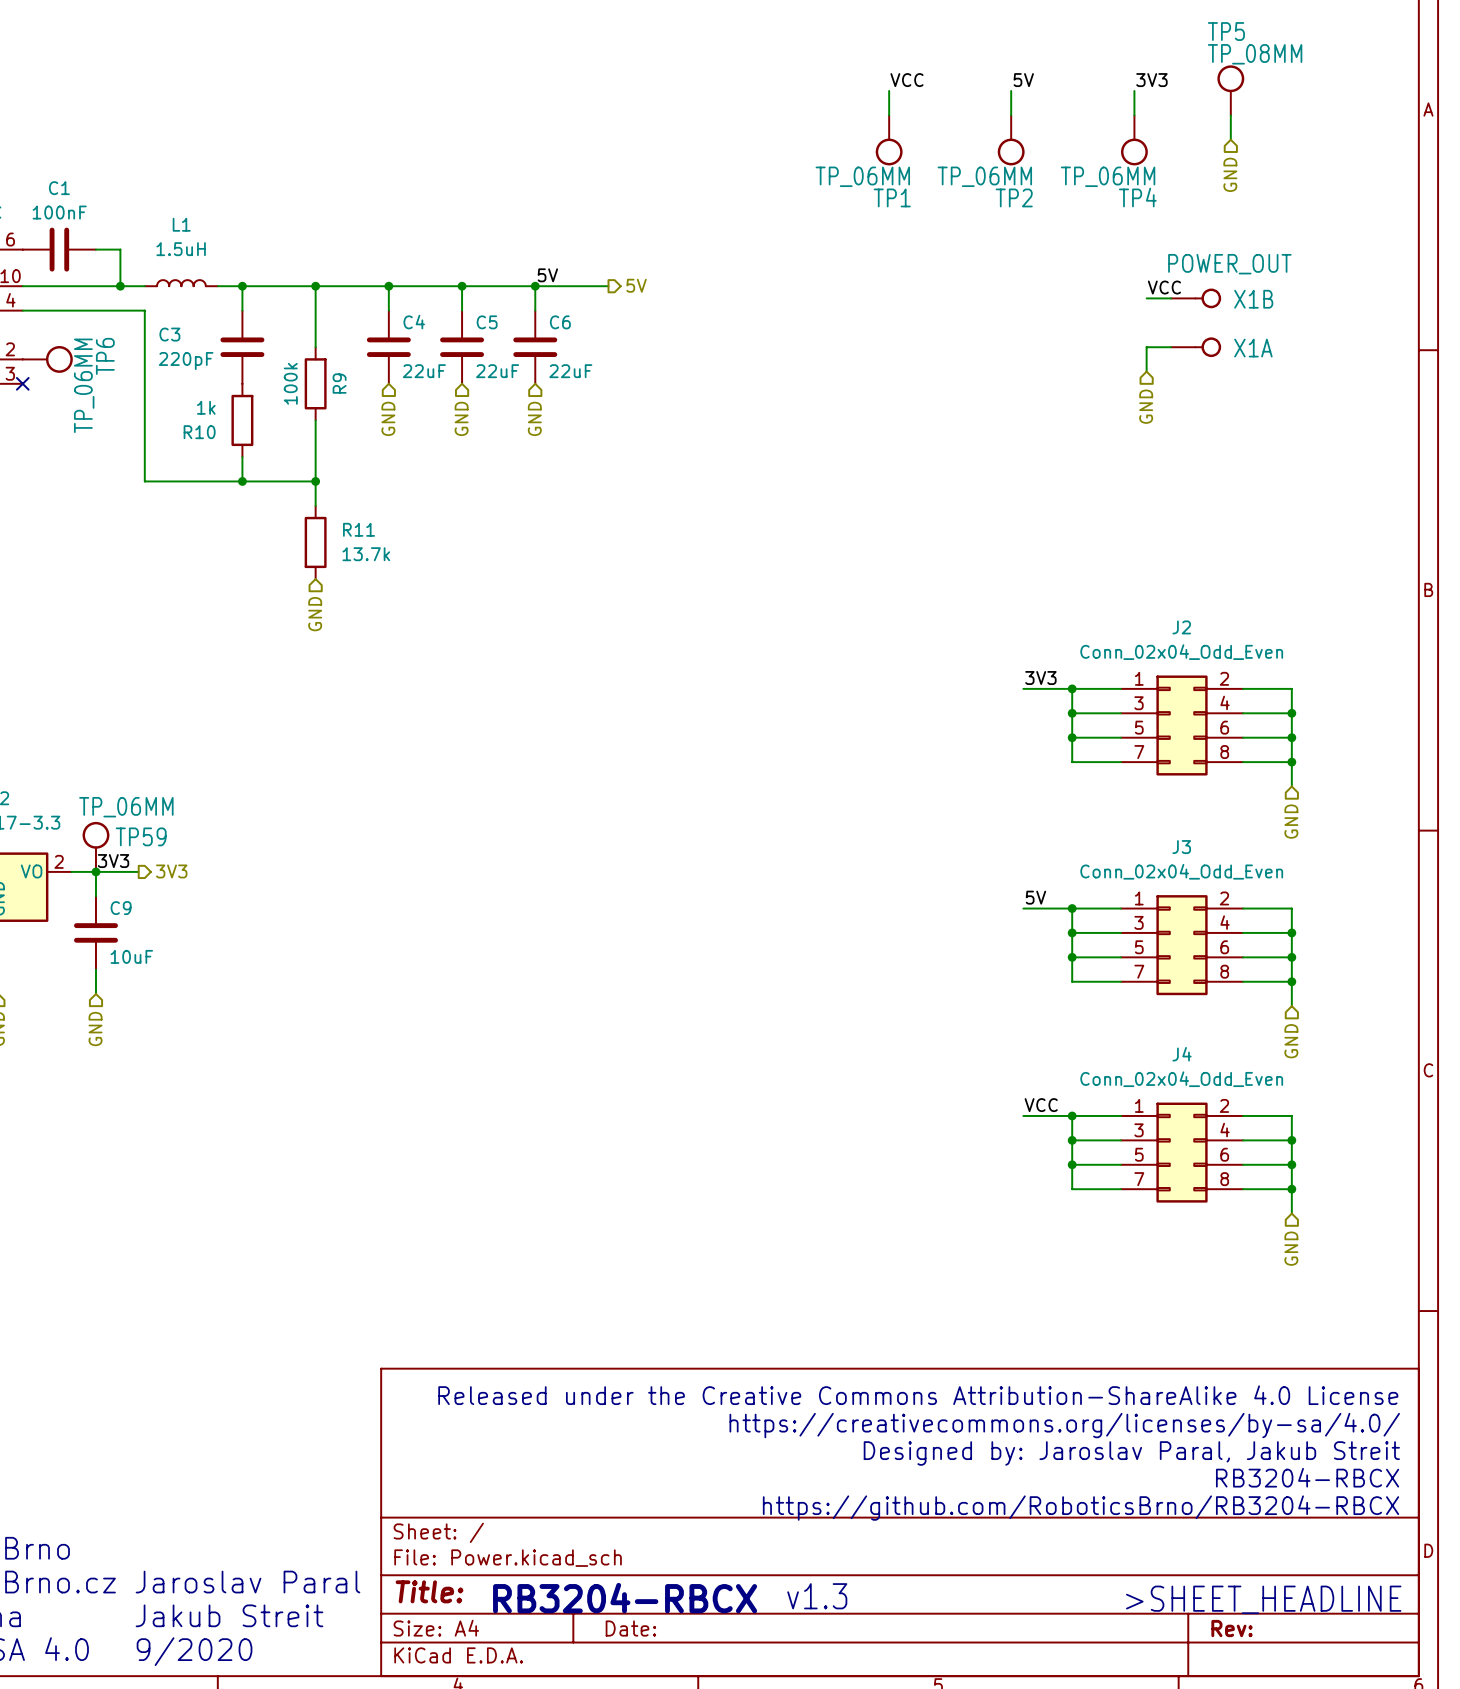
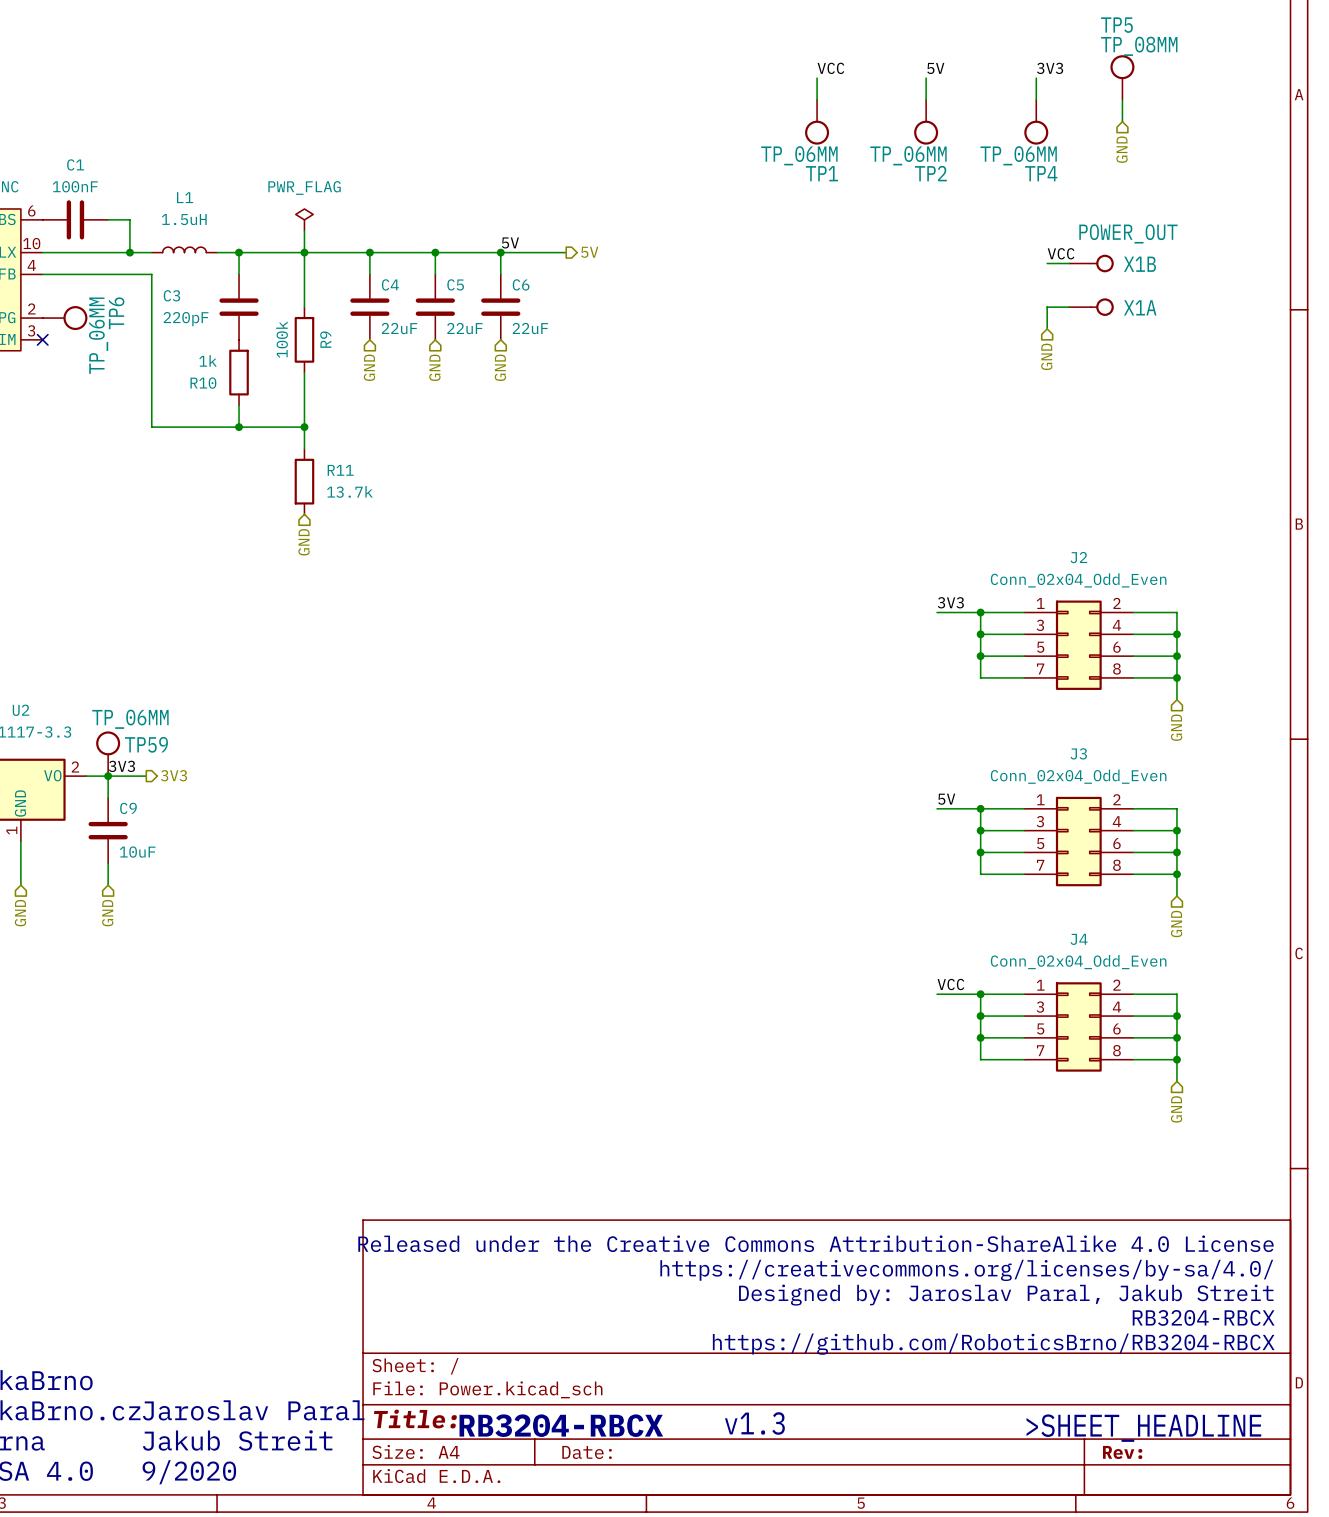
power symbol: none -> PWR_FLAG (304, 219)
wire: none -> (304, 230) (304, 252)

